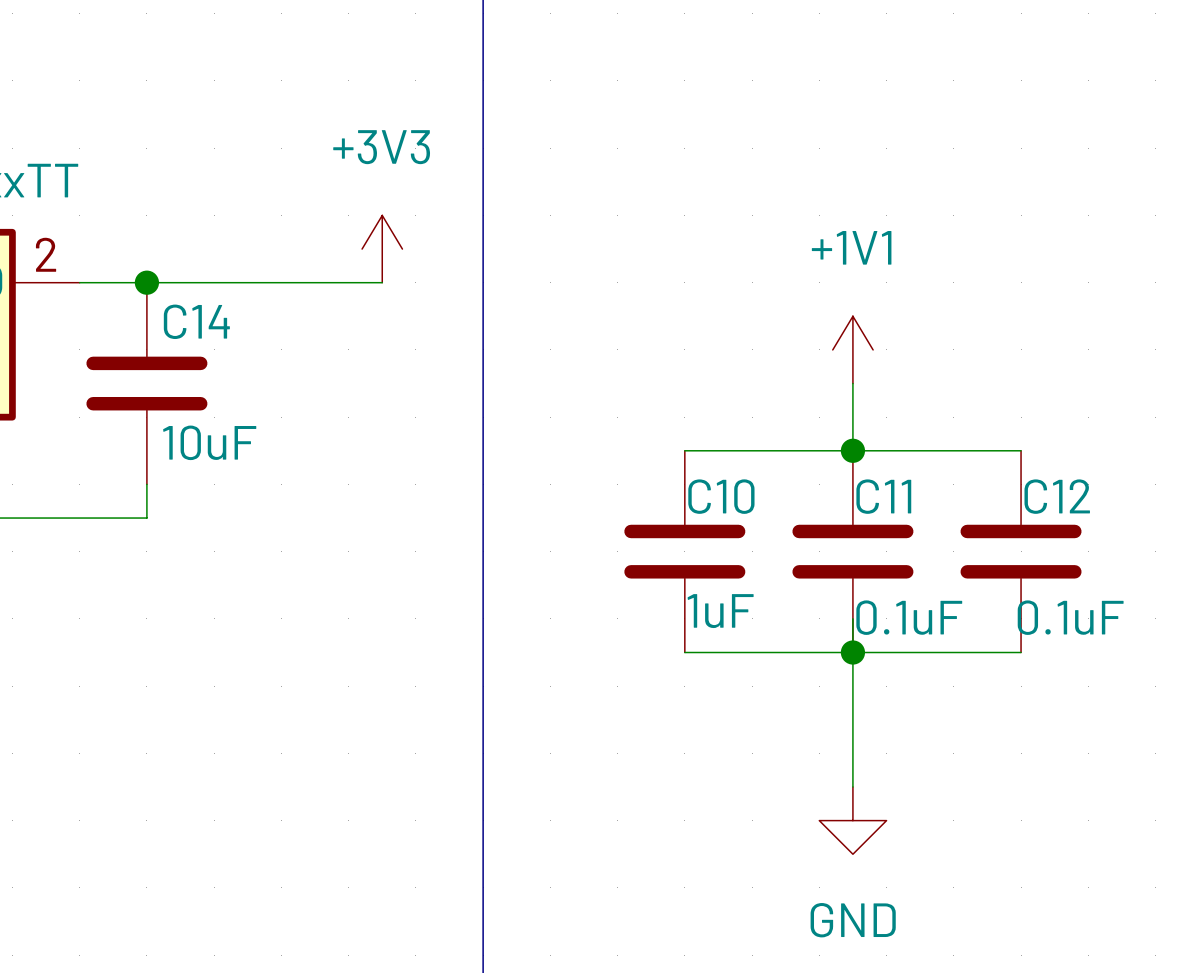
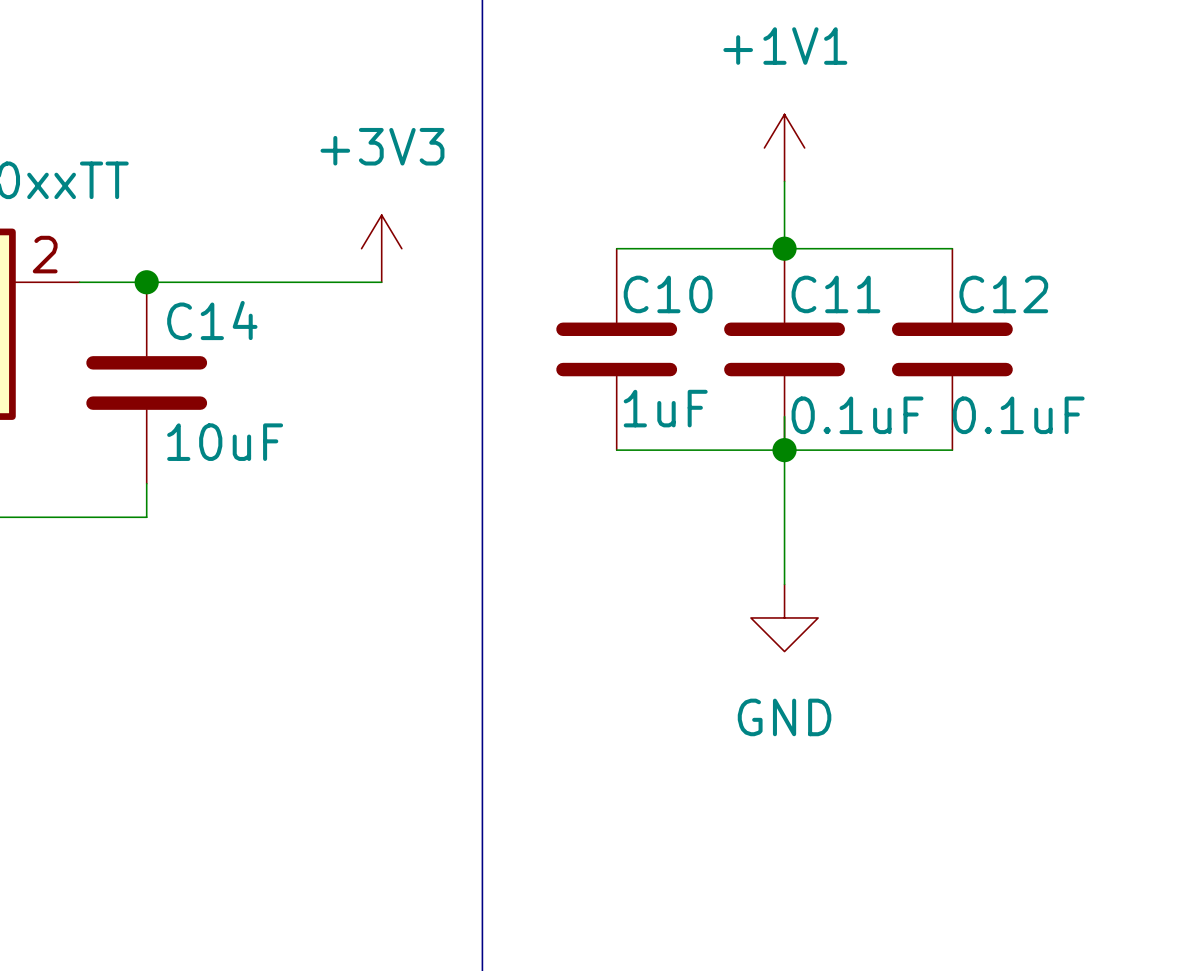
junction: none -> (784, 248)
power symbol position: +1V1 (852, 349) -> +1V1 (784, 147)
wire: (852, 383) (852, 450) -> (784, 181) (784, 248)
junction position: (852, 450) -> (784, 450)
wire: (953, 450) (1021, 450) -> (616, 450) (683, 450)
C10 position: (684, 551) -> (616, 349)
C11 position: (852, 551) -> (784, 349)
C12 position: (1021, 551) -> (952, 349)
wire: (852, 618) (852, 786) -> (784, 416) (784, 584)
wire: (684, 652) (1021, 652) -> (616, 248) (952, 248)
junction: (852, 652) -> none
power symbol position: GND (852, 820) -> GND (784, 617)

